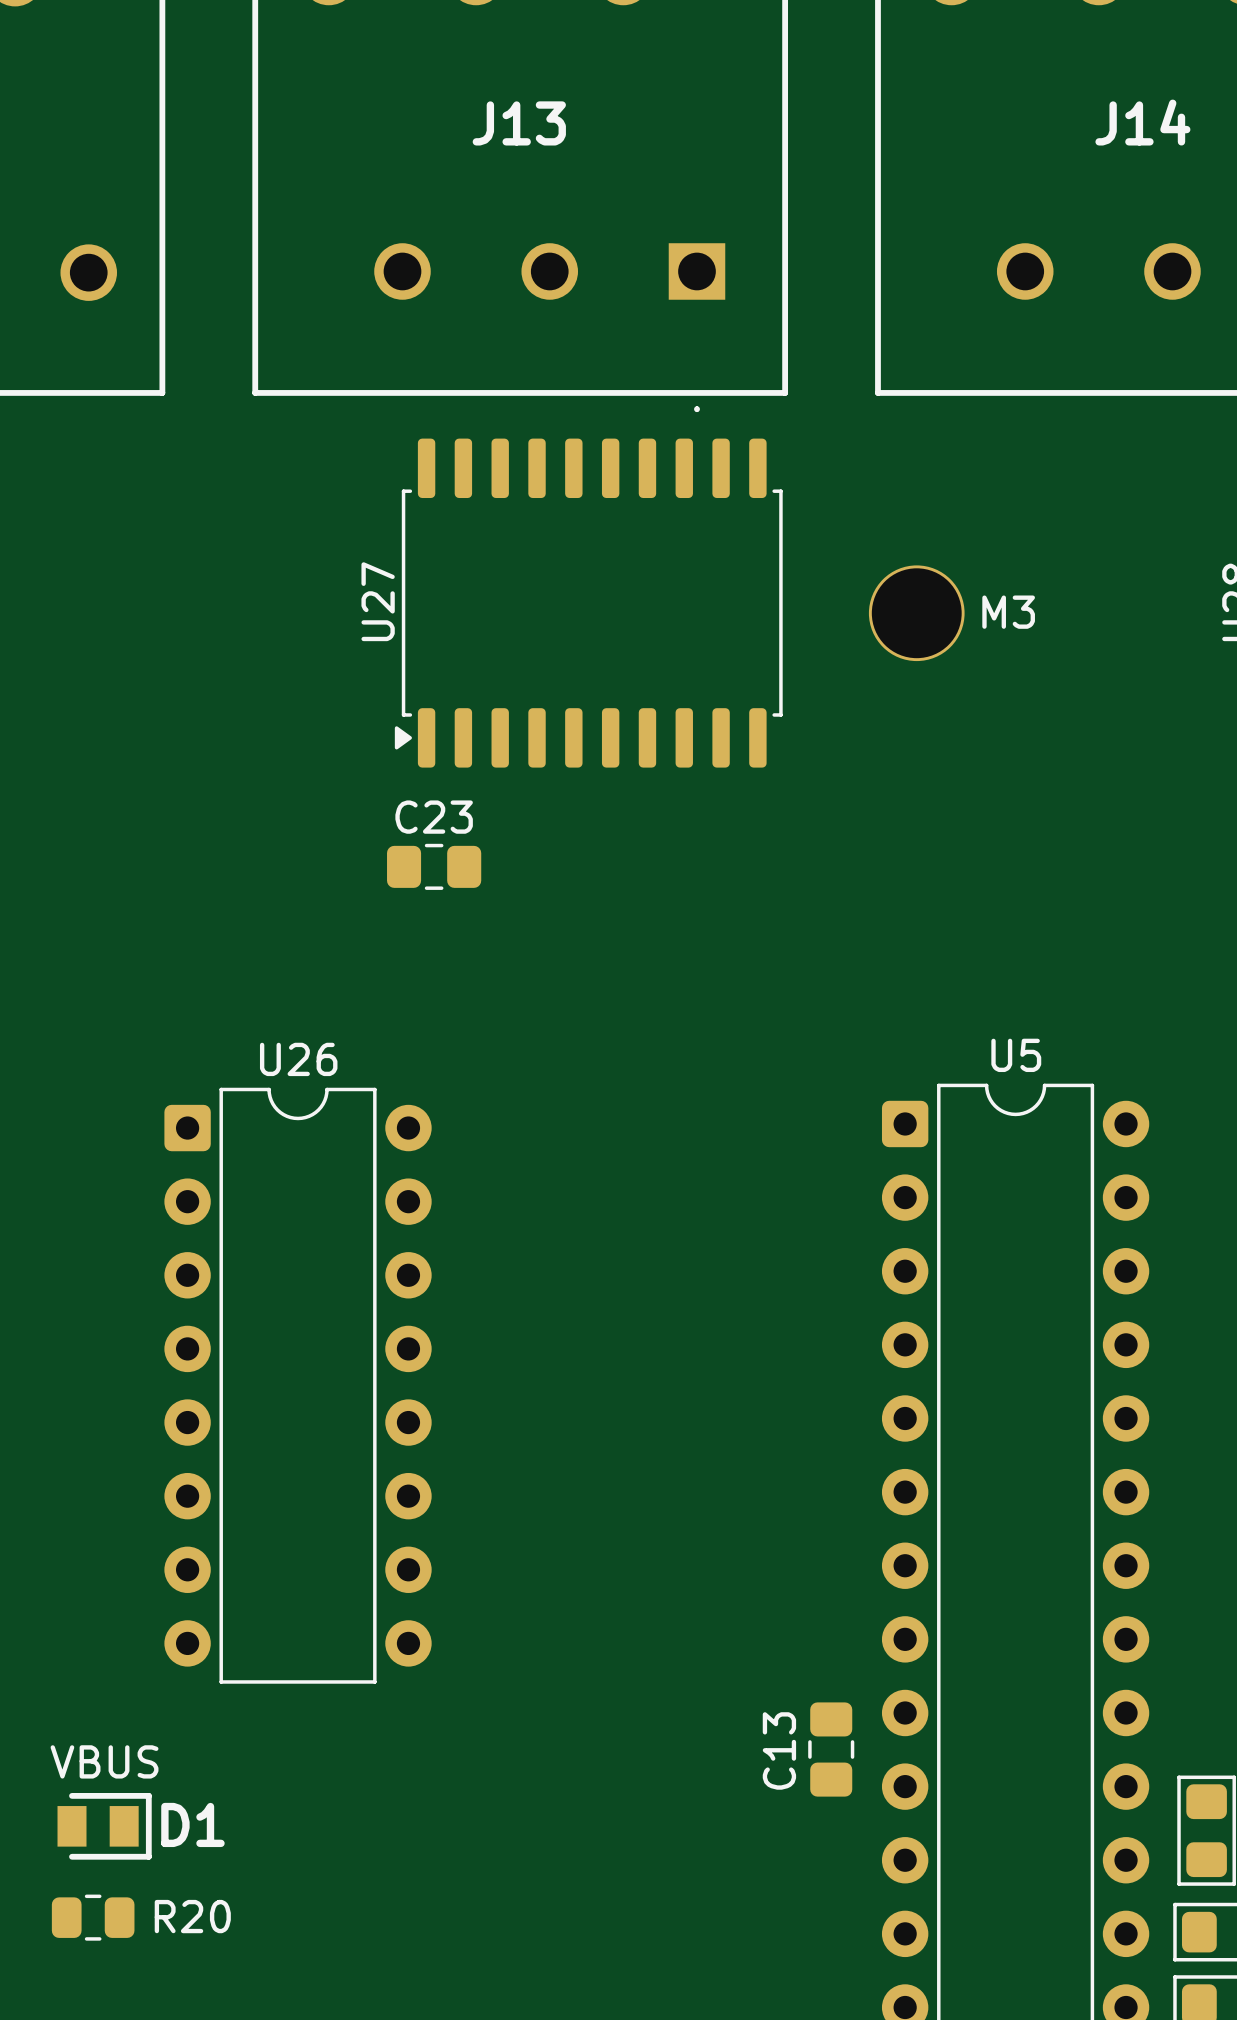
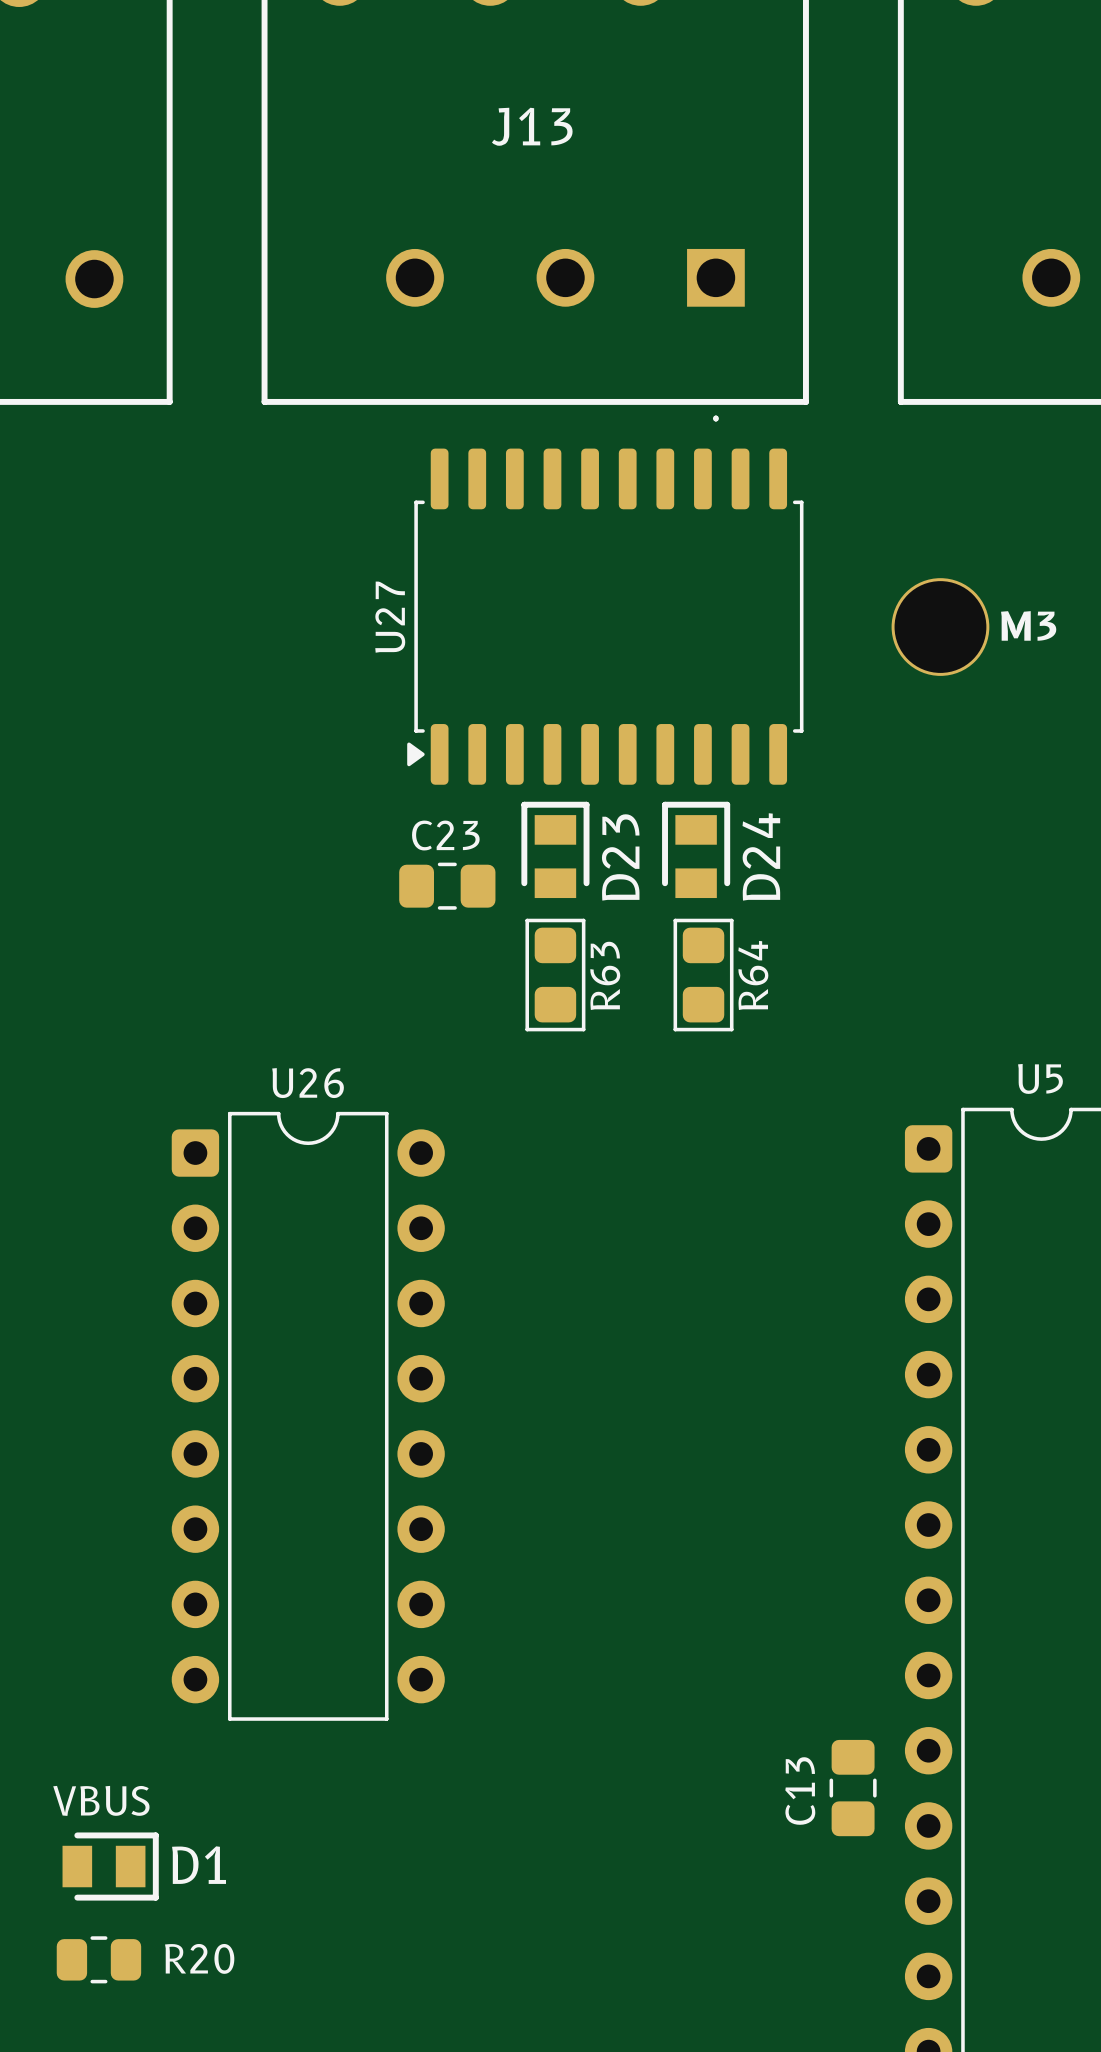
D23: none -> (555, 849)
D24: none -> (696, 849)
R63: none -> (555, 975)
R64: none -> (703, 975)

